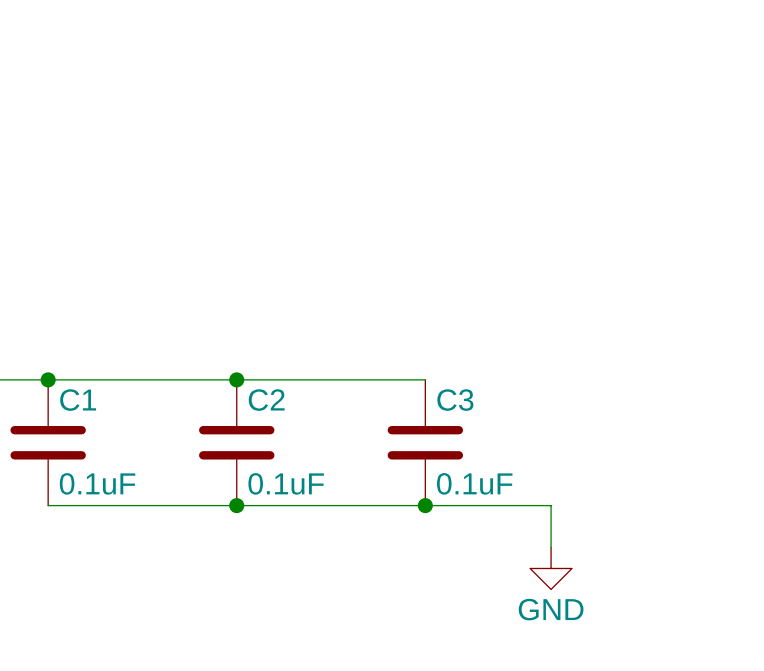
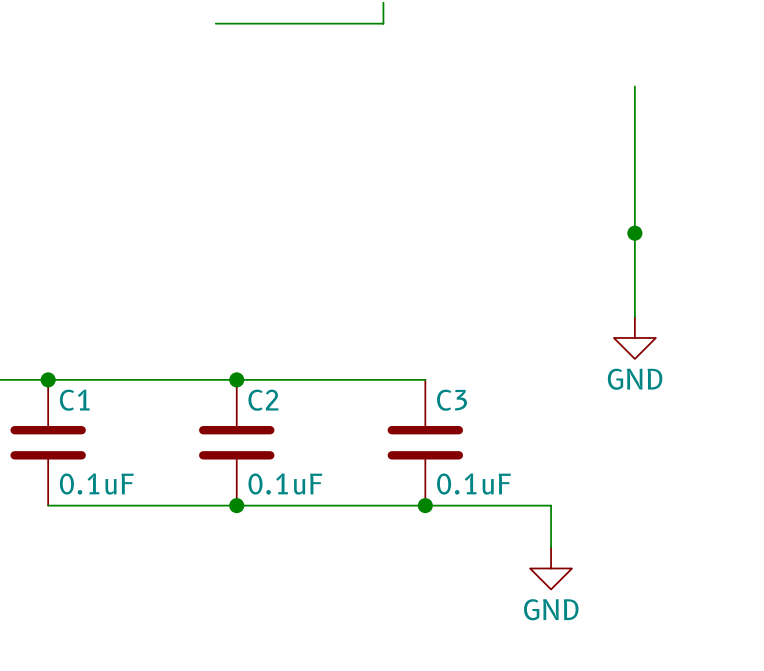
wire: none -> (383, 2) (383, 23) (215, 23)
wire: none -> (634, 86) (634, 317)
junction: none -> (634, 233)
power symbol: none -> GND (634, 337)

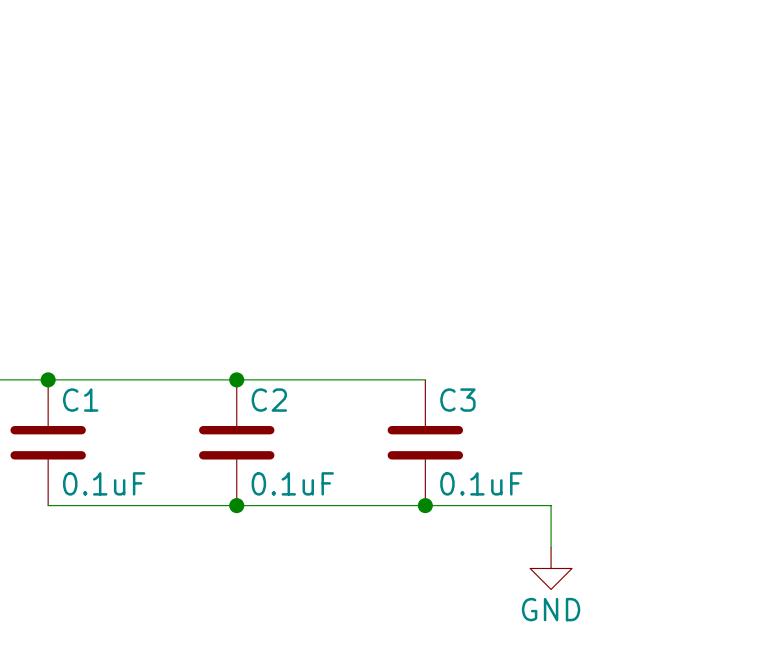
wire: (383, 2) (383, 23) (215, 23) -> none
wire: (634, 86) (634, 317) -> none
junction: (634, 233) -> none
power symbol: GND (634, 337) -> none

